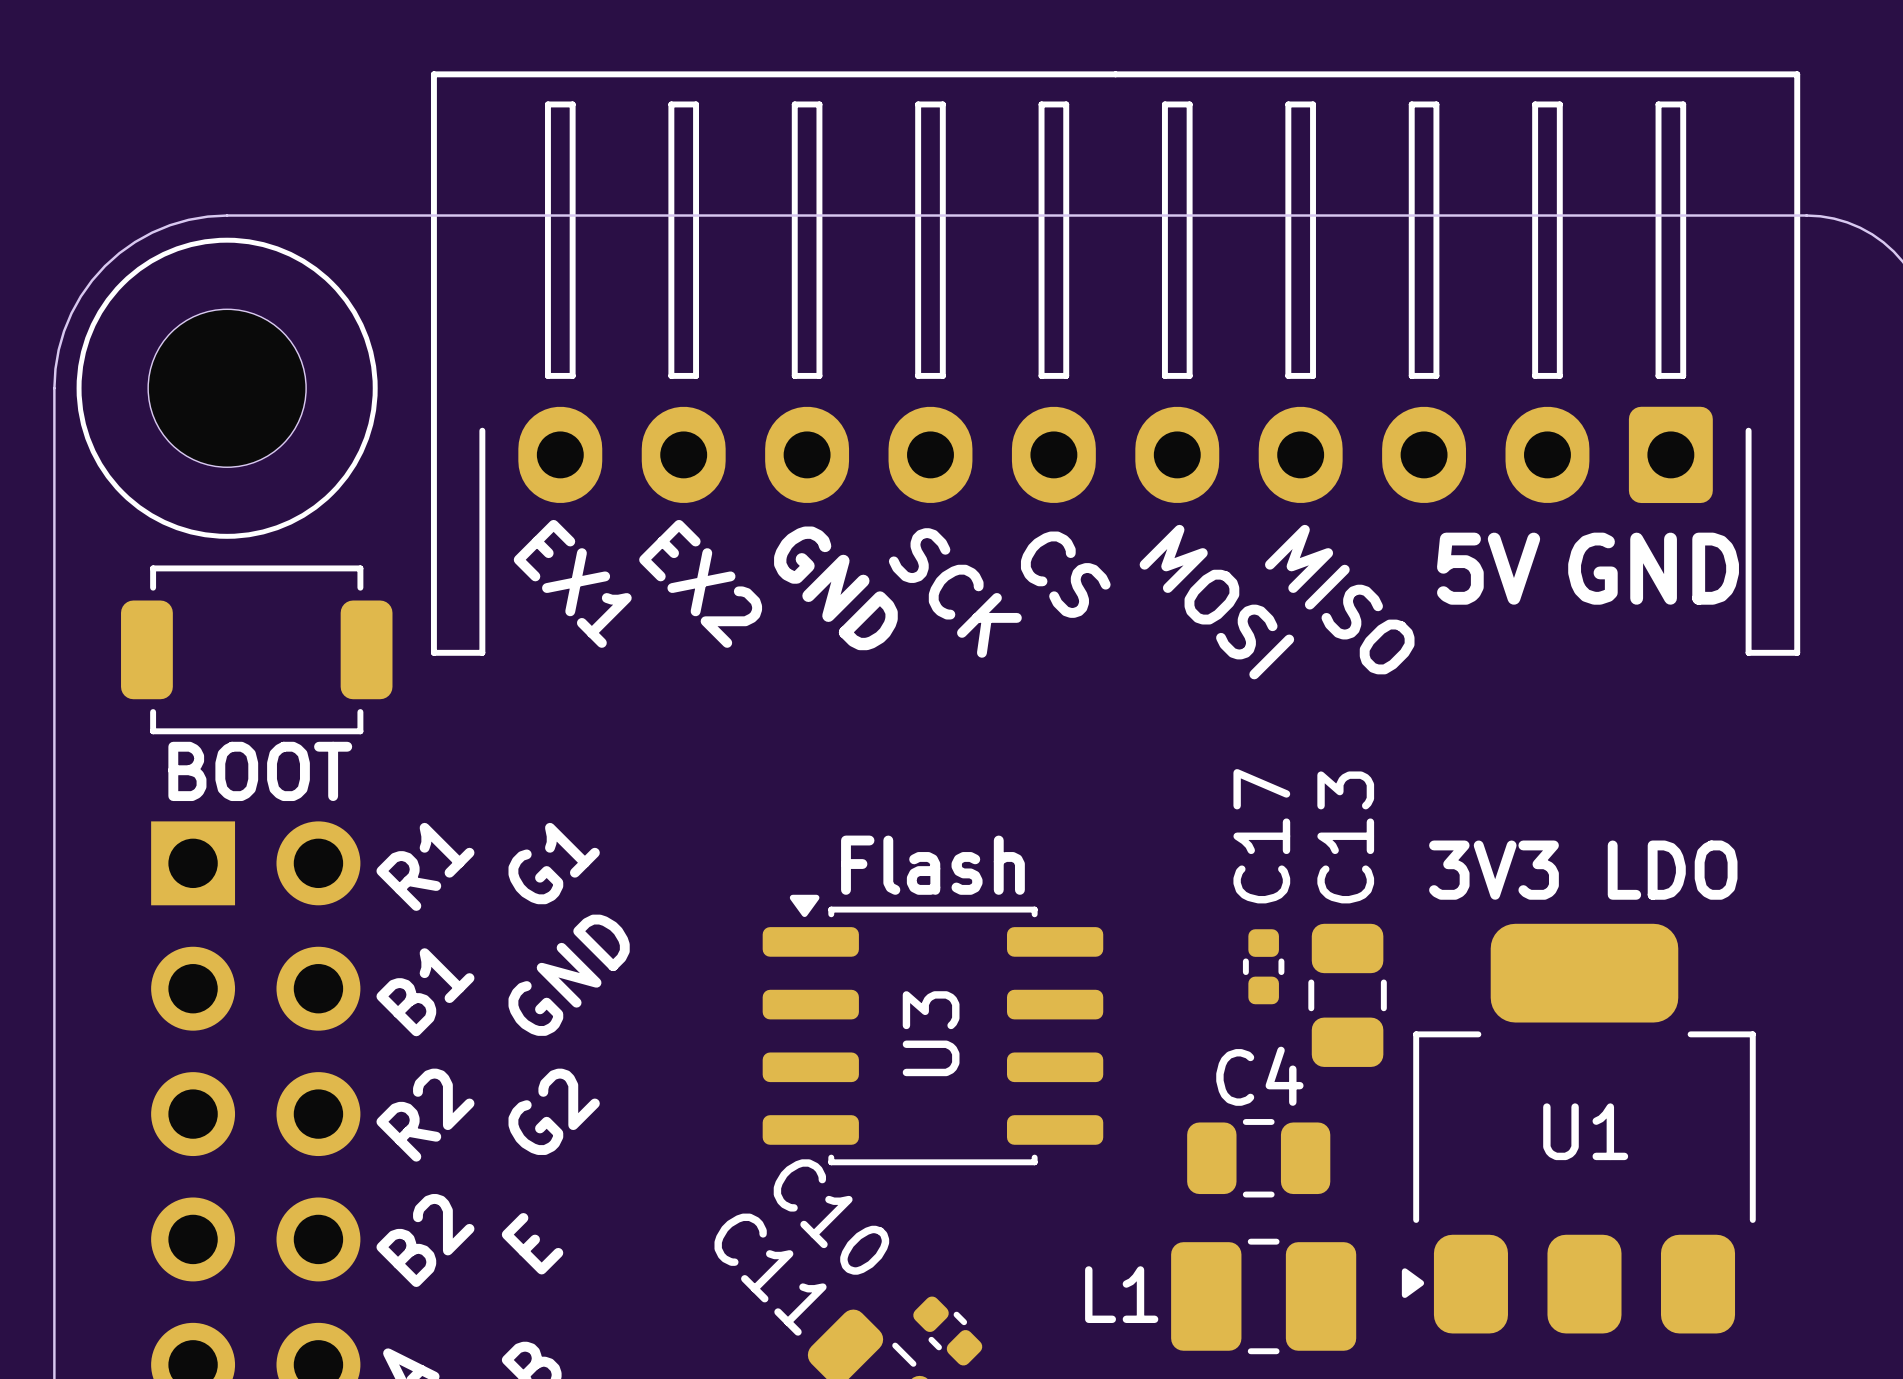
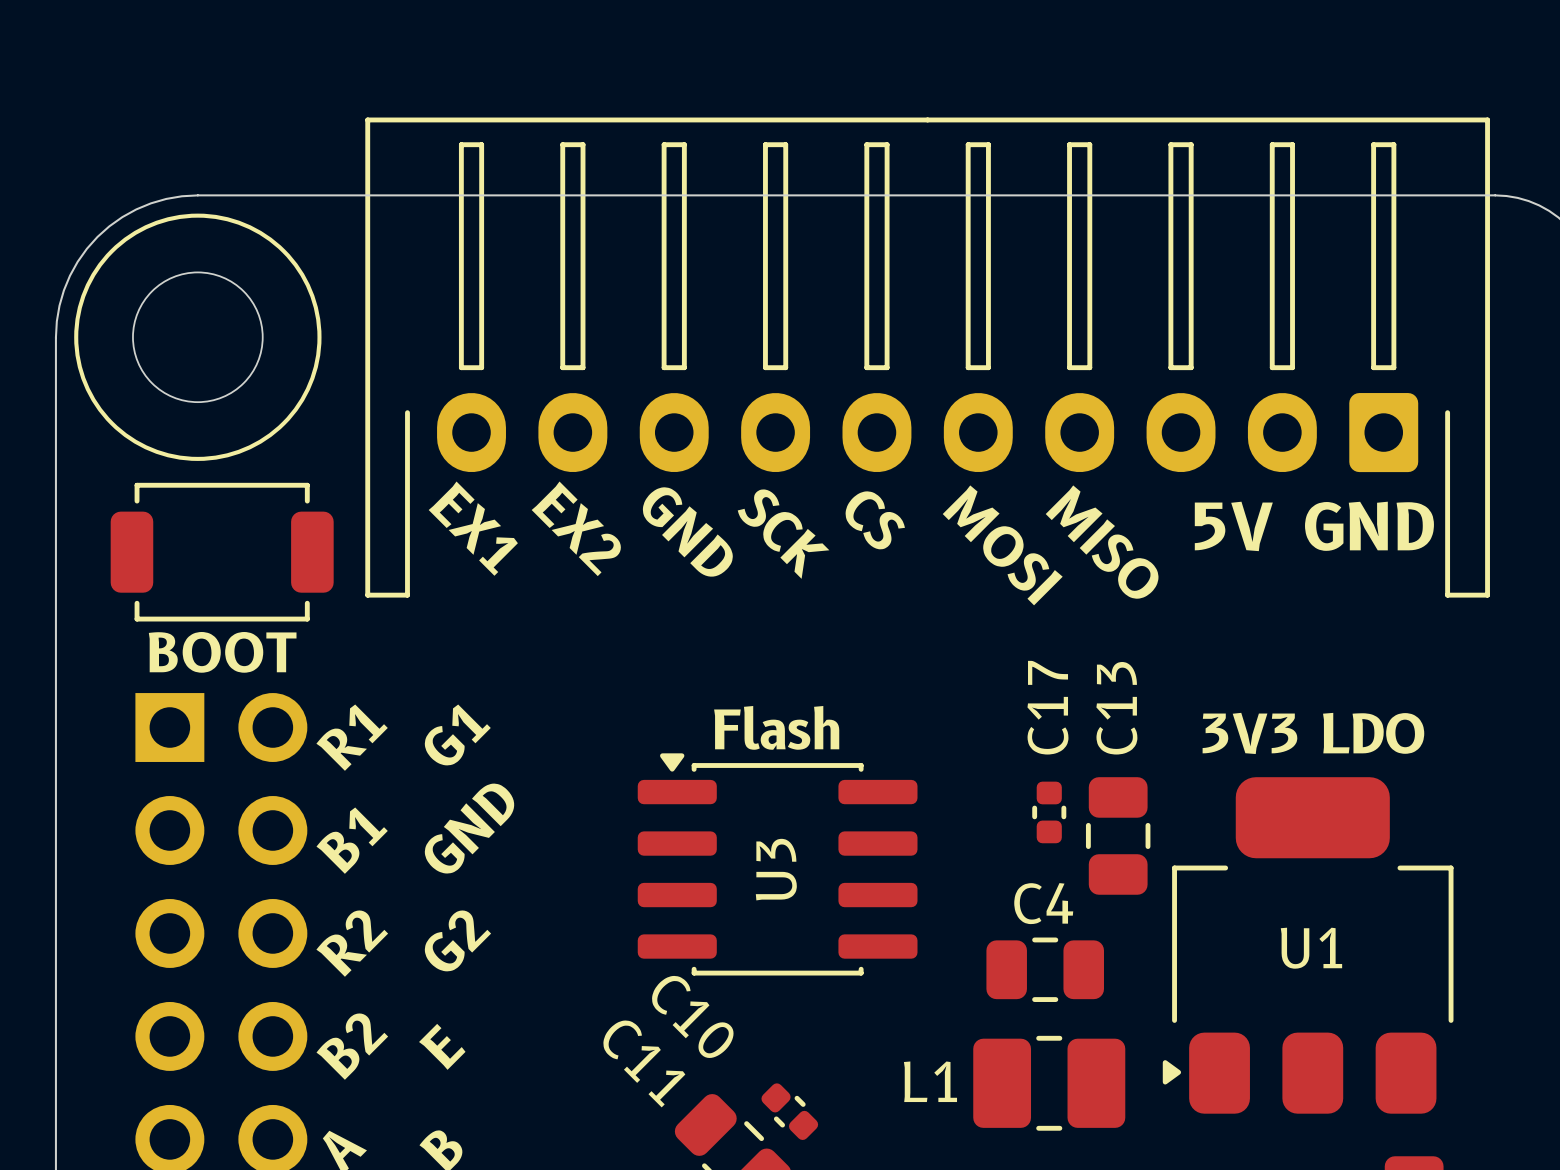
part position: (1115, 363) -> (927, 357)
text position: 5V (1488, 568) -> 5V (1233, 526)
text position: GND (1653, 568) -> GND (1369, 526)
text position: CS (1065, 574) -> CS (875, 520)
text position: EX1 (572, 583) -> EX1 (473, 528)
text position: EX2 (700, 583) -> EX2 (576, 528)
text position: GND (835, 588) -> GND (687, 531)
text position: SCK (955, 592) -> SCK (783, 534)
text position: MISO (1339, 599) -> MISO (1102, 542)
text position: MOSI (1216, 602) -> MOSI (1002, 545)

